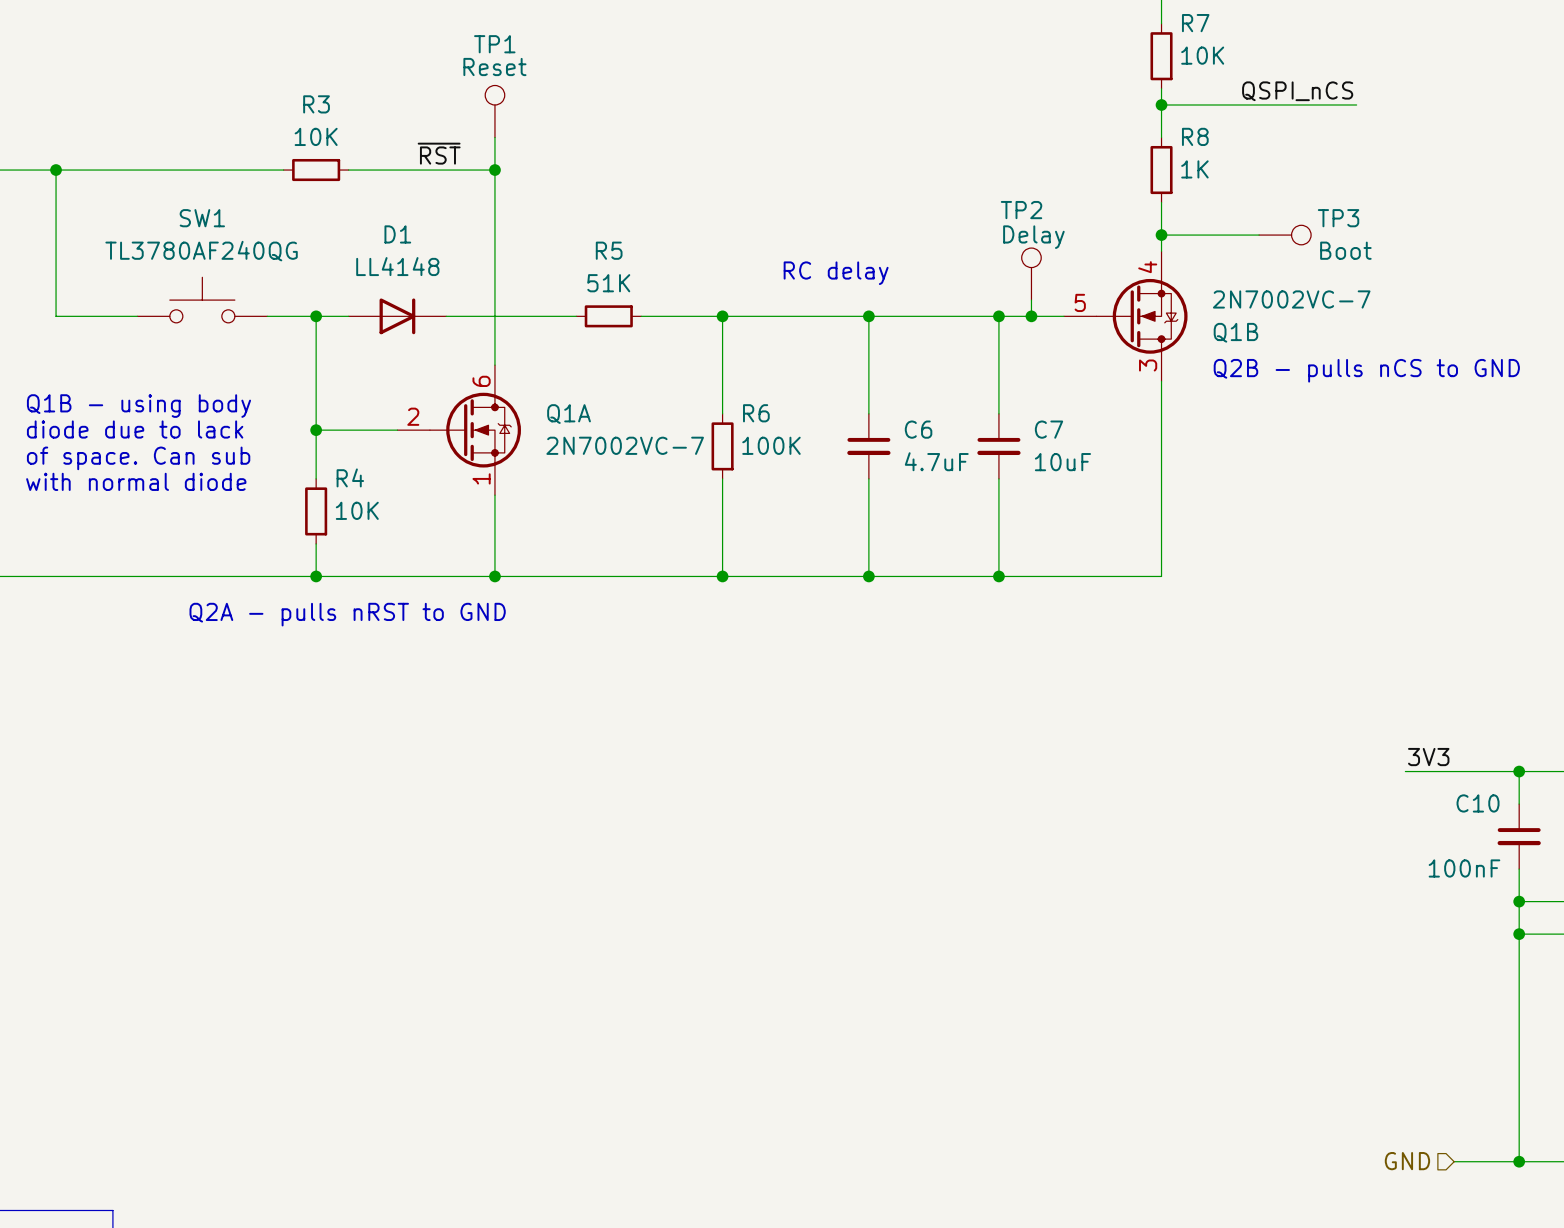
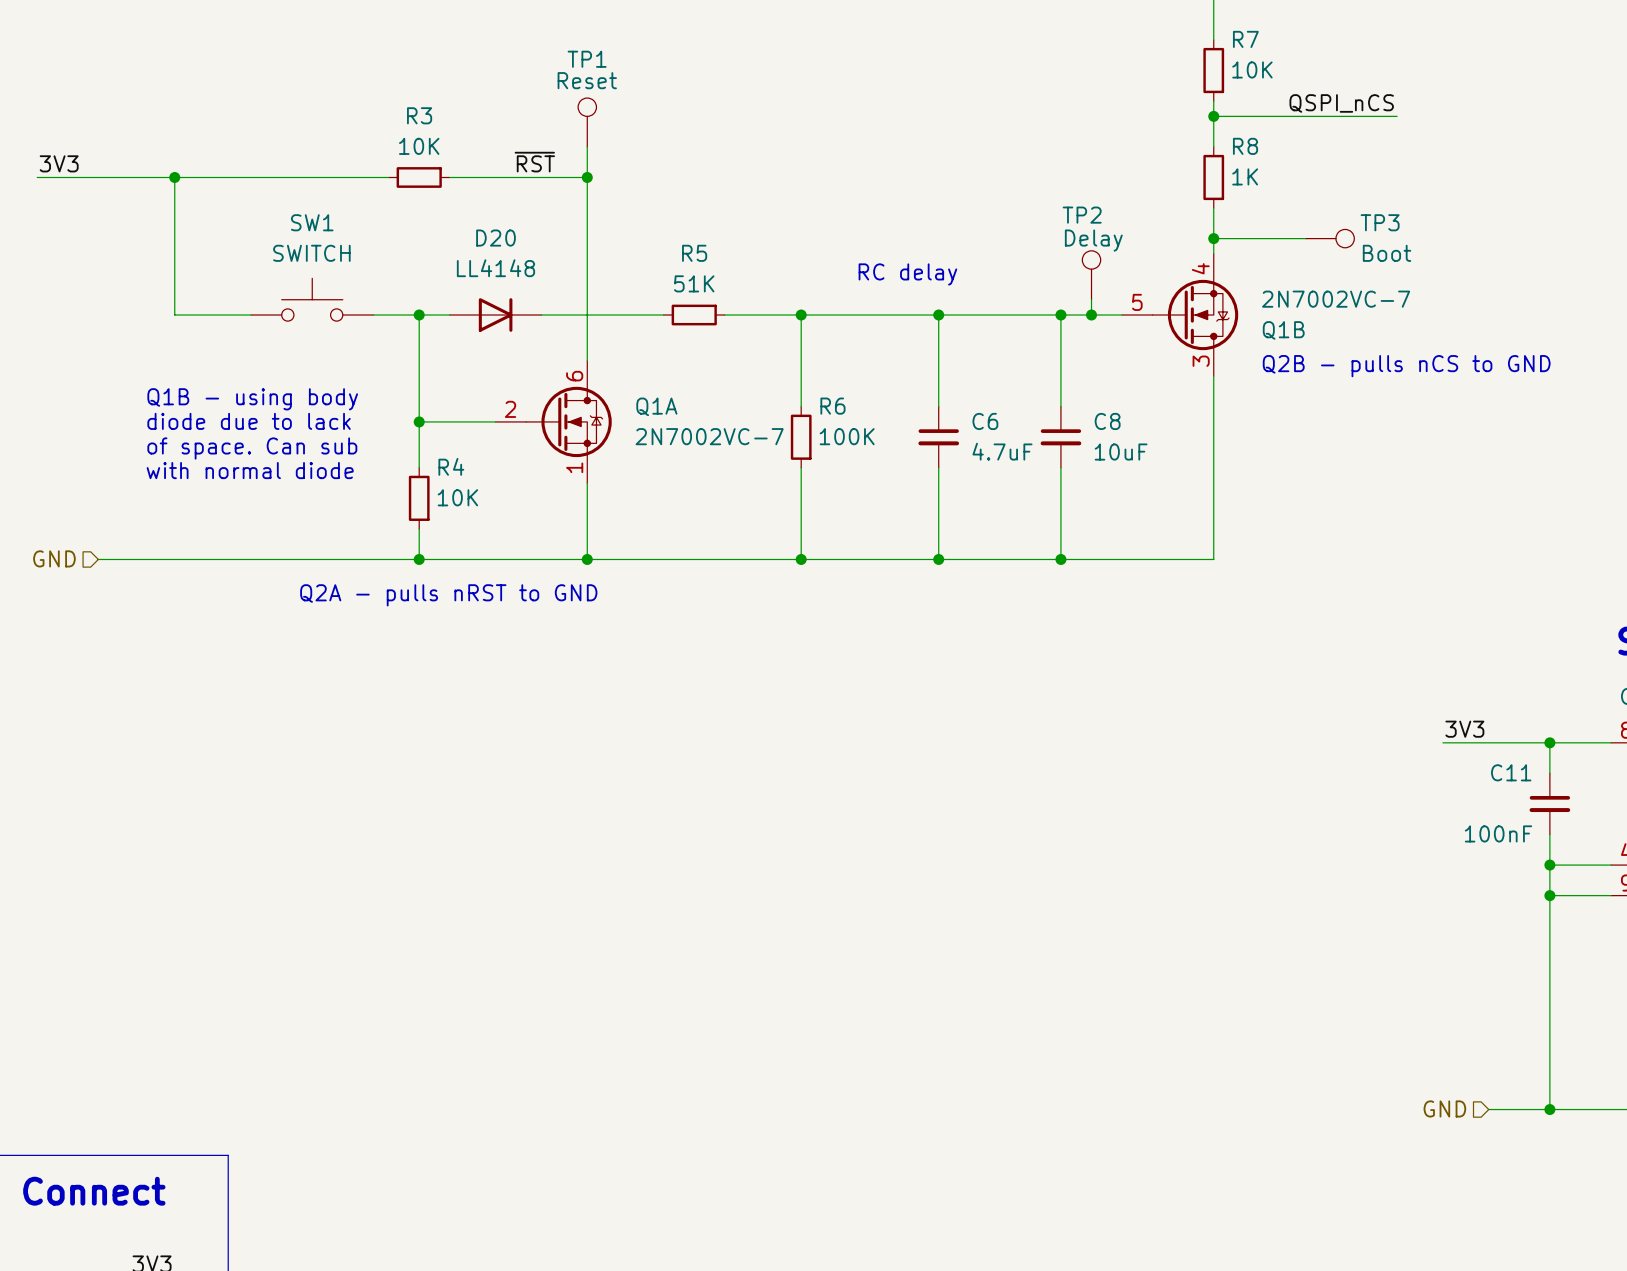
D1 name: D1 (397, 234) -> D20 (495, 238)
SW1 value: TL3780AF240QG (201, 251) -> SWITCH (311, 253)
C7 name: C7 (1049, 429) -> C8 (1107, 421)
C10 name: C10 (1478, 803) -> C11 (1511, 772)

